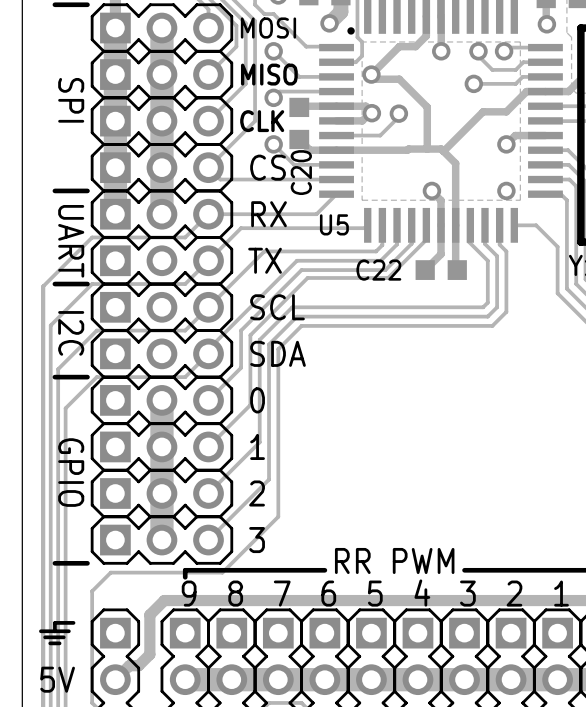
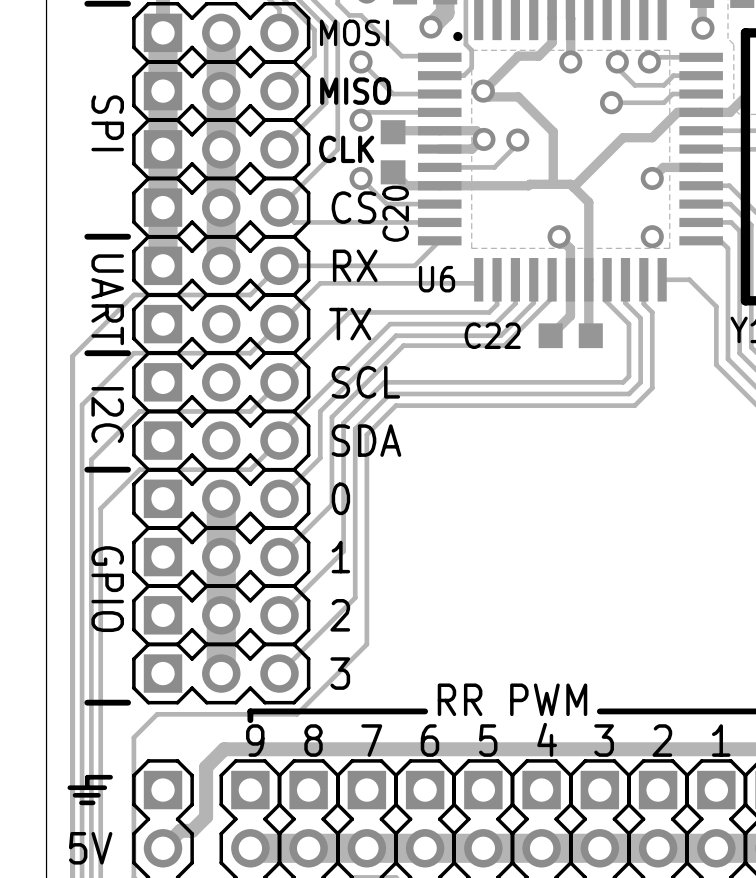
U5 name: U5 (334, 224) -> U6 (437, 279)

